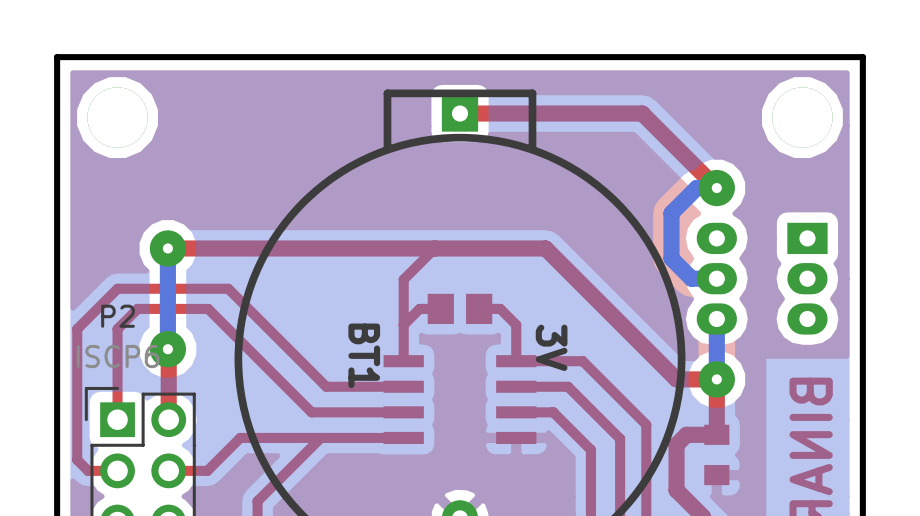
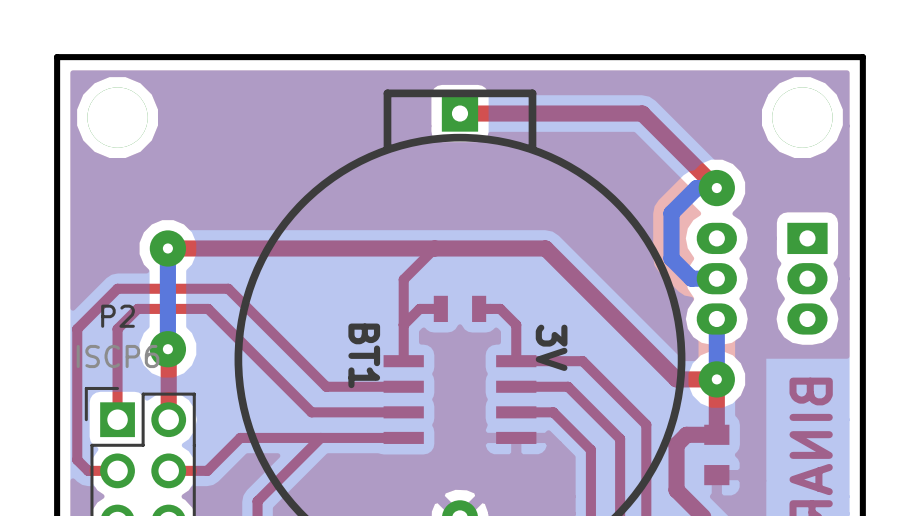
part footprint: [427, 293, 493, 325] -> [433, 295, 487, 323]

